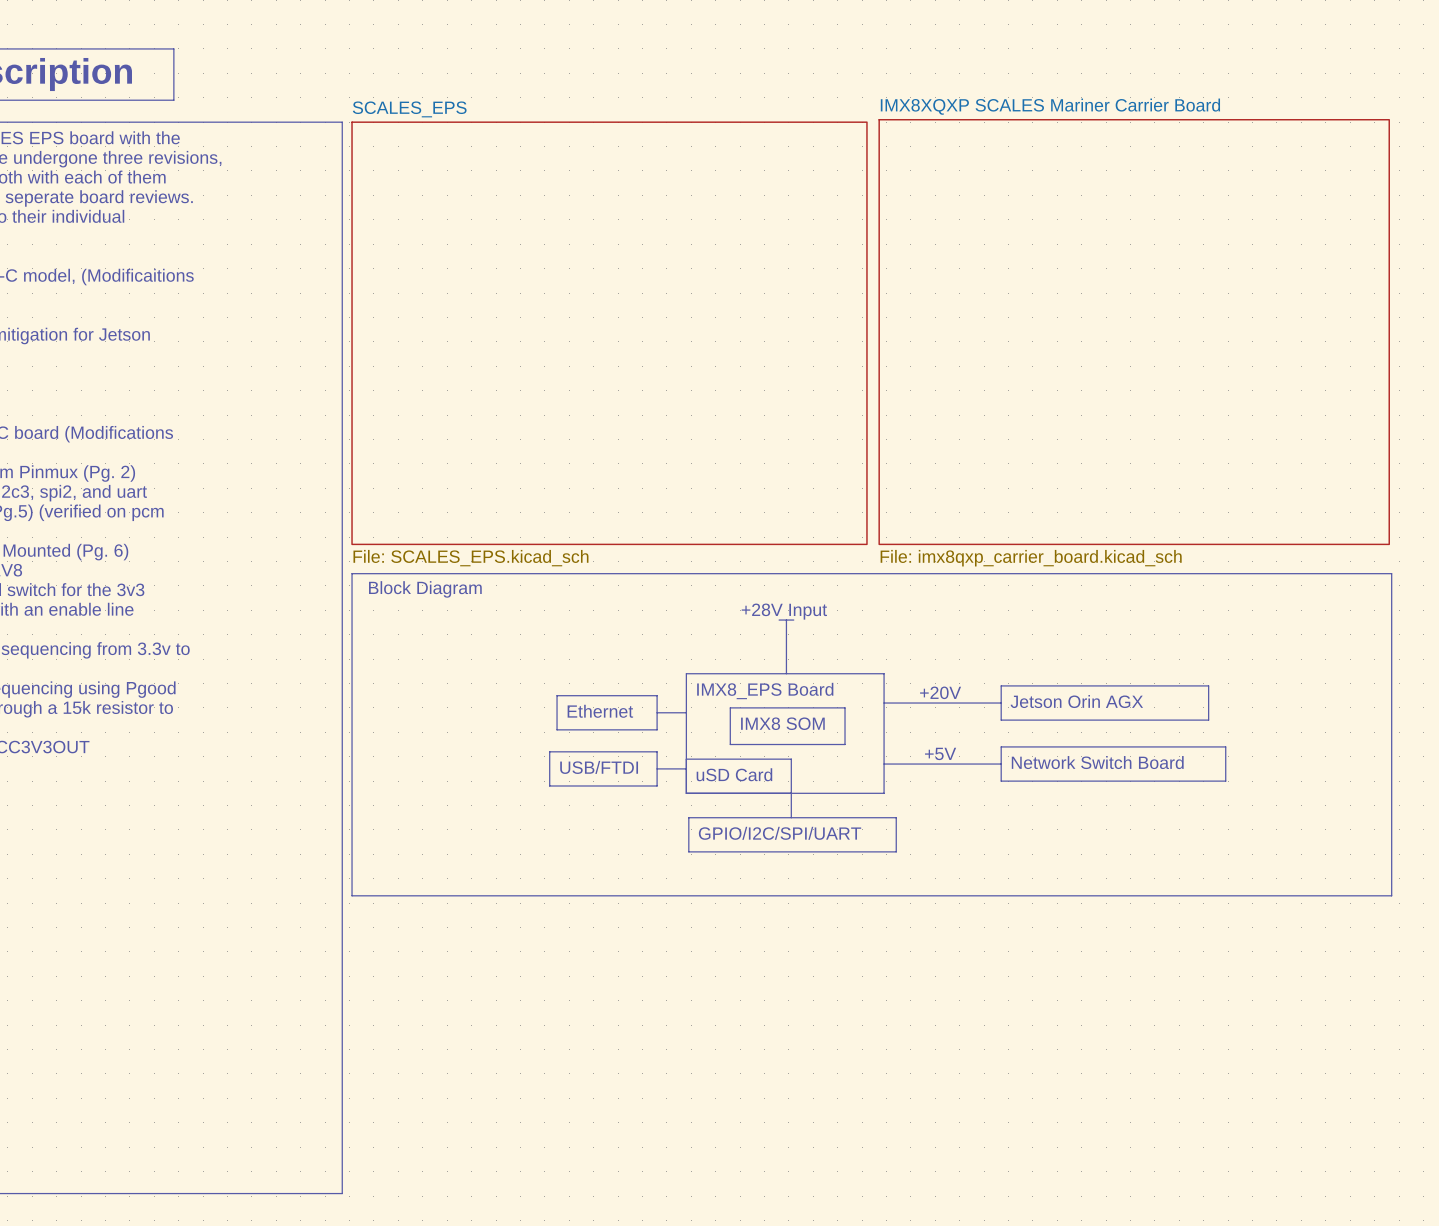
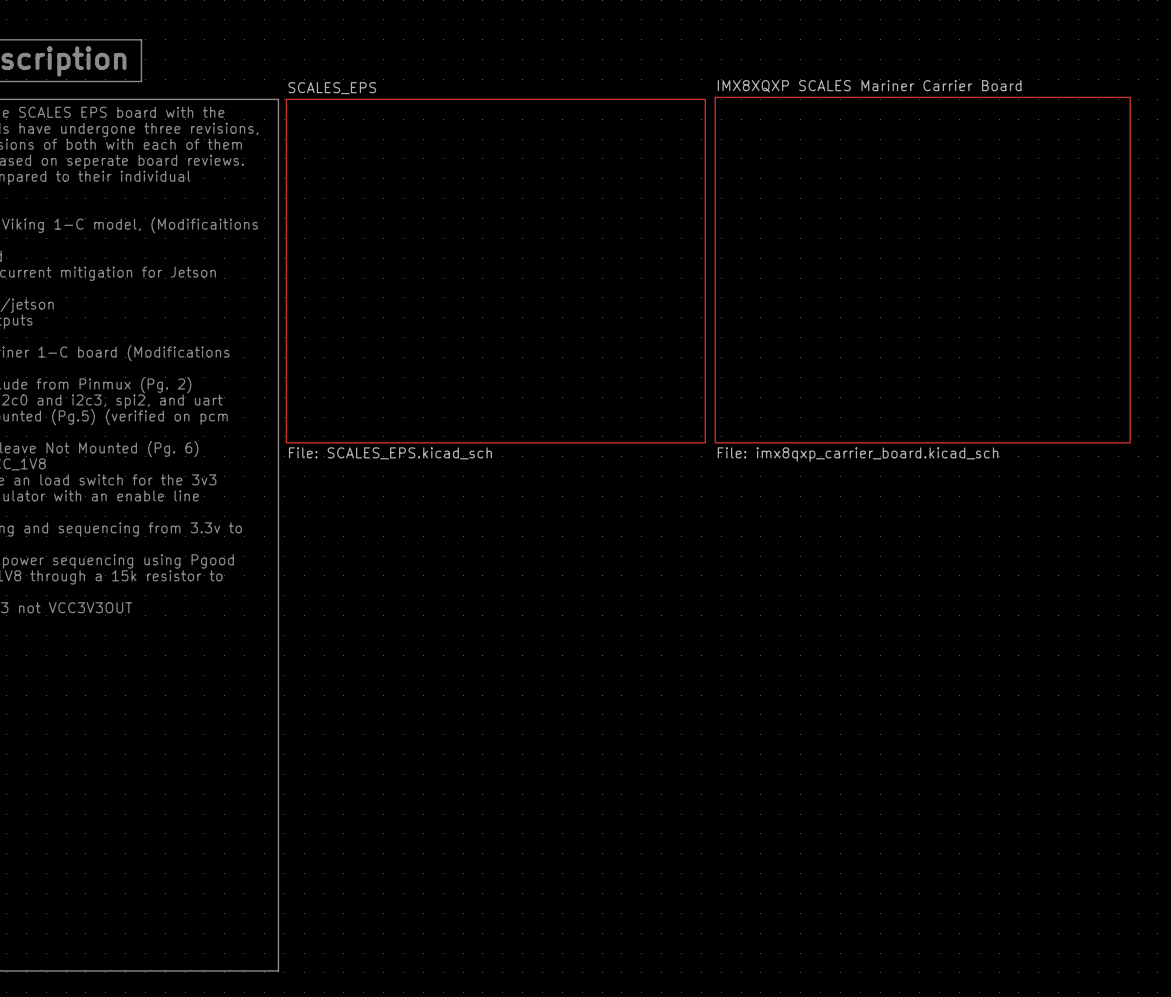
line: (352, 573) (1391, 573) (1391, 895) (352, 895) (352, 573) -> none
text: Block Diagram (425, 589) -> none
text: +28V Input (784, 611) -> none
line: (779, 620) (793, 620) -> none
line: (786, 620) (786, 673) -> none
line: (686, 673) (884, 673) (884, 793) (686, 793) (686, 673) -> none
line: (1001, 685) (1208, 685) (1208, 720) (1001, 720) (1001, 685) -> none
text: IMX8_EPS Board (765, 691) -> none
text: +20V (940, 692) -> none
line: (557, 695) (657, 695) (657, 729) (557, 729) (557, 695) -> none
text: Jetson Orin AGX (1076, 701) -> none
line: (884, 703) (1001, 703) -> none
line: (730, 707) (845, 707) (845, 744) (730, 744) (730, 707) -> none
text: Ethernet (600, 711) -> none
line: (657, 712) (686, 712) -> none
text: IMX8 SOM (782, 723) -> none
line: (1001, 746) (1001, 781) (1225, 781) (1225, 746) (1001, 746) -> none
line: (549, 751) (657, 751) (657, 785) (549, 785) (549, 751) -> none
text: +5V (940, 753) -> none
line: (686, 759) (791, 759) (791, 817) -> none
text: Network Switch Board (1097, 762) -> none
line: (884, 764) (1001, 764) -> none
text: USB/FTDI (599, 767) -> none
line: (657, 768) (686, 768) -> none
text: uSD Card (734, 774) -> none
line: (688, 817) (896, 817) (896, 851) (688, 851) (688, 817) -> none
text: GPIO/I2C/SPI/UART (780, 833) -> none

